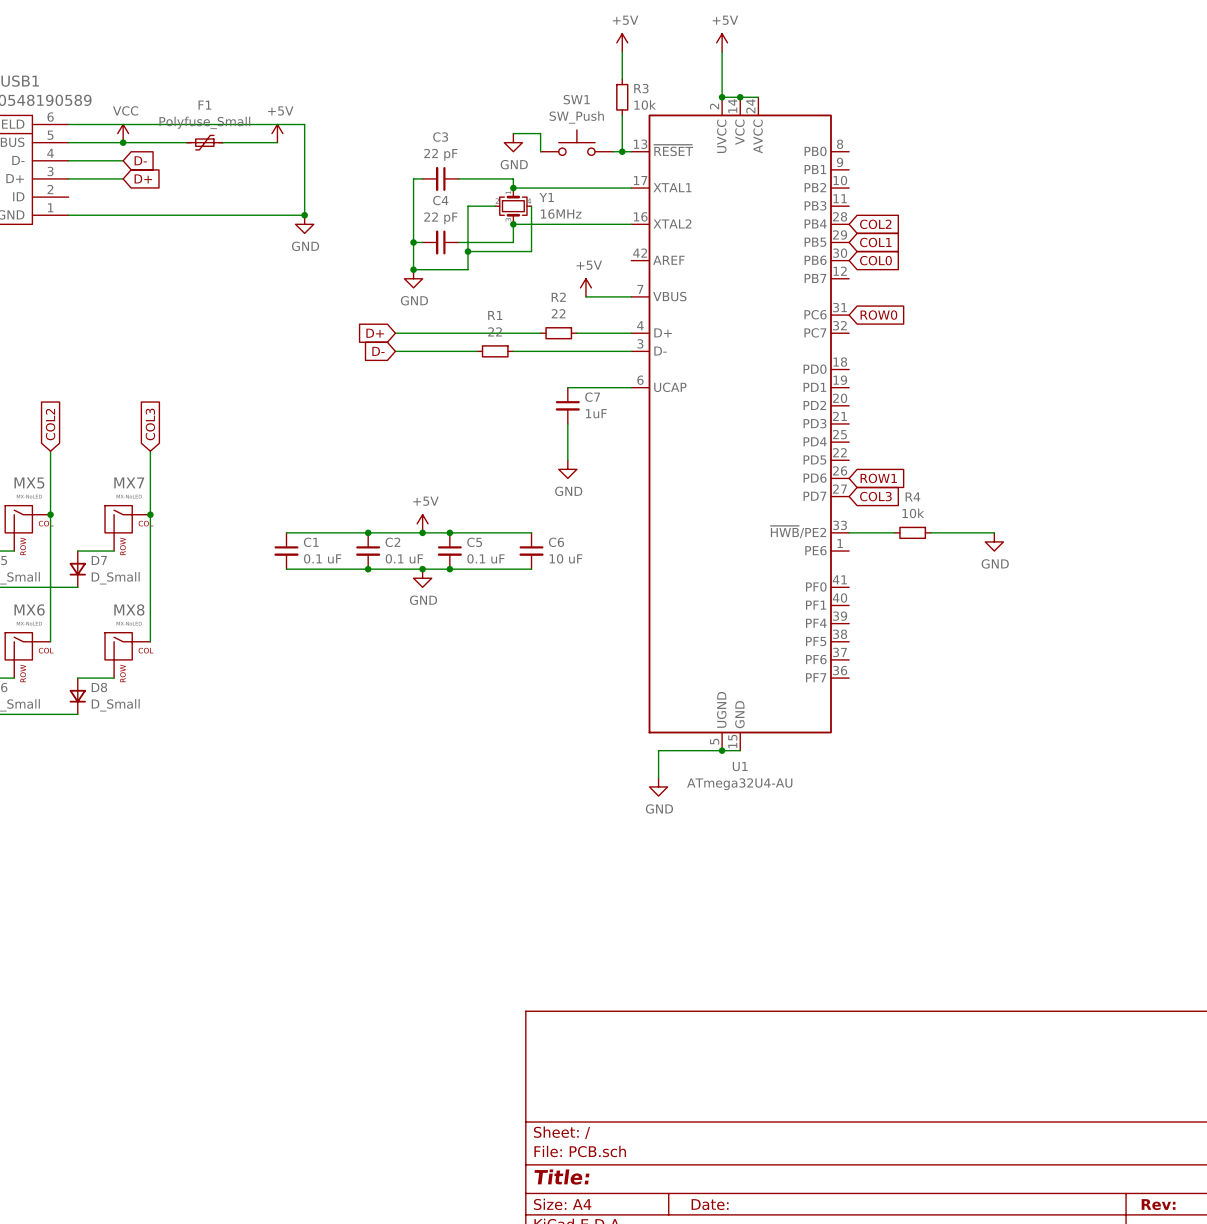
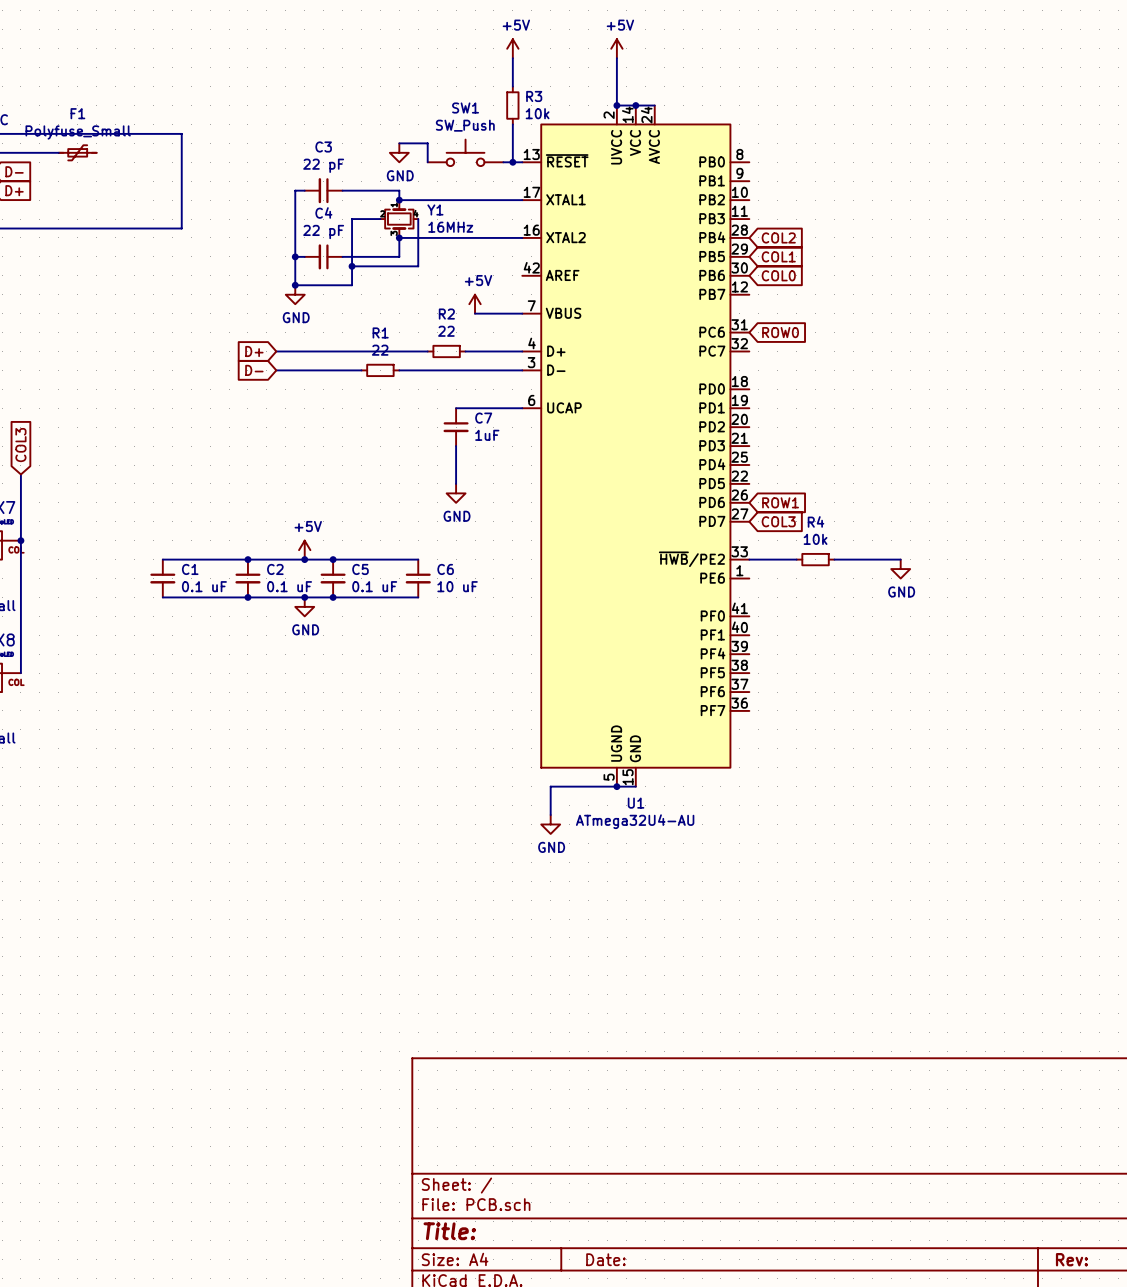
power symbol: +5V (277, 133) -> none
wire: (222, 142) (277, 142) -> none
junction: (304, 215) -> none
power symbol: GND (304, 224) -> none

